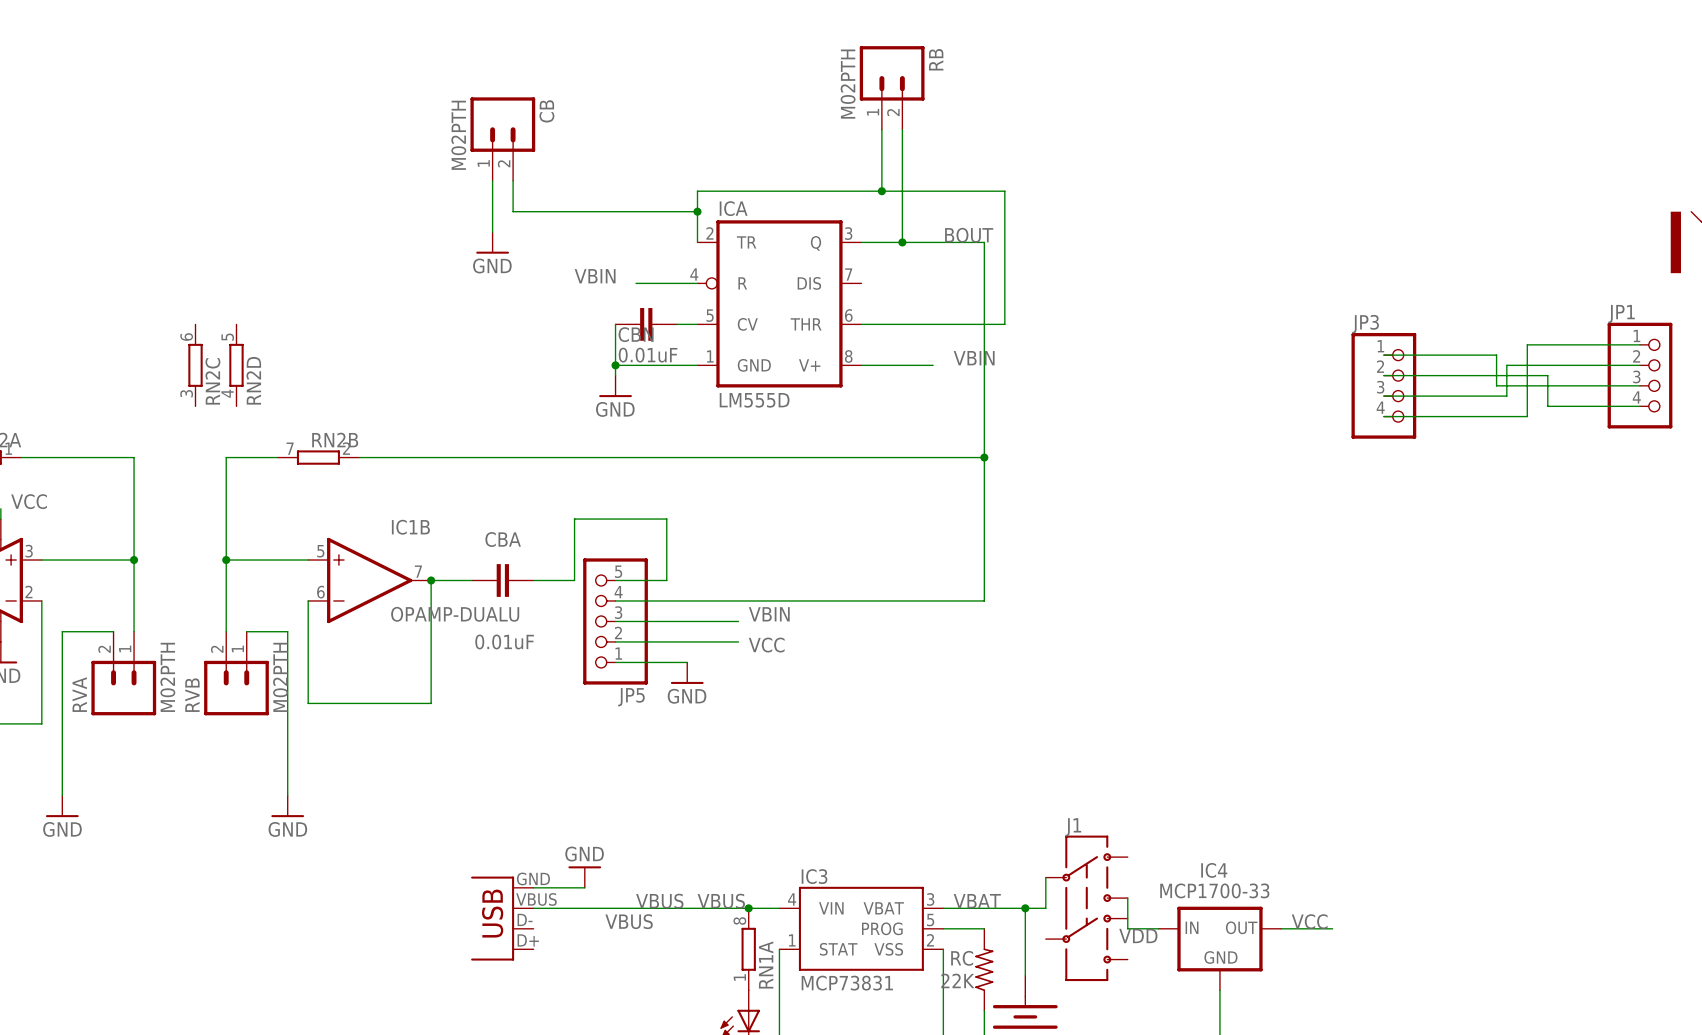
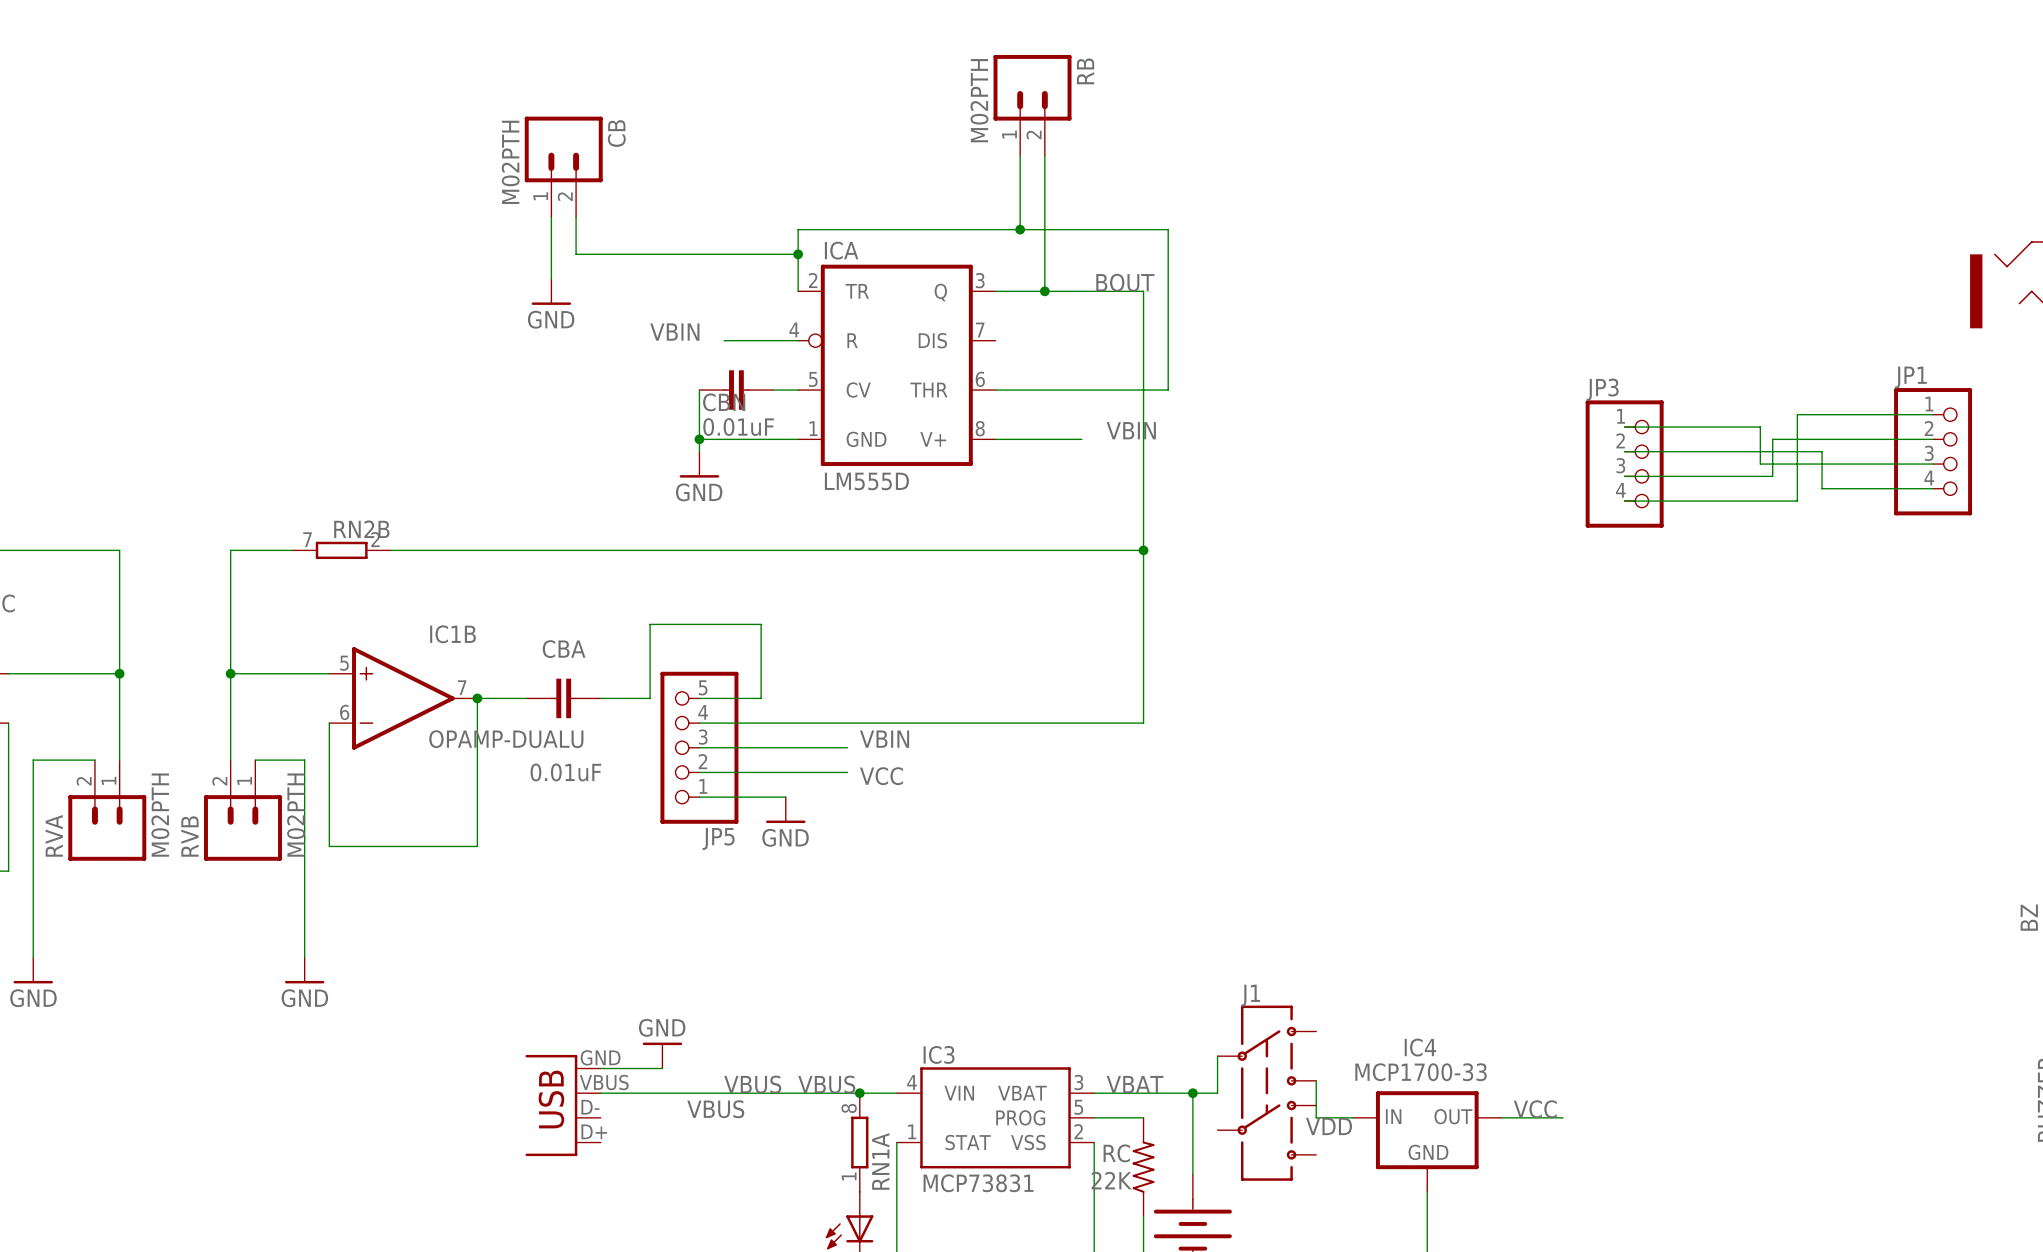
RN2C: (195, 365) -> none
RN2D: (236, 365) -> none

